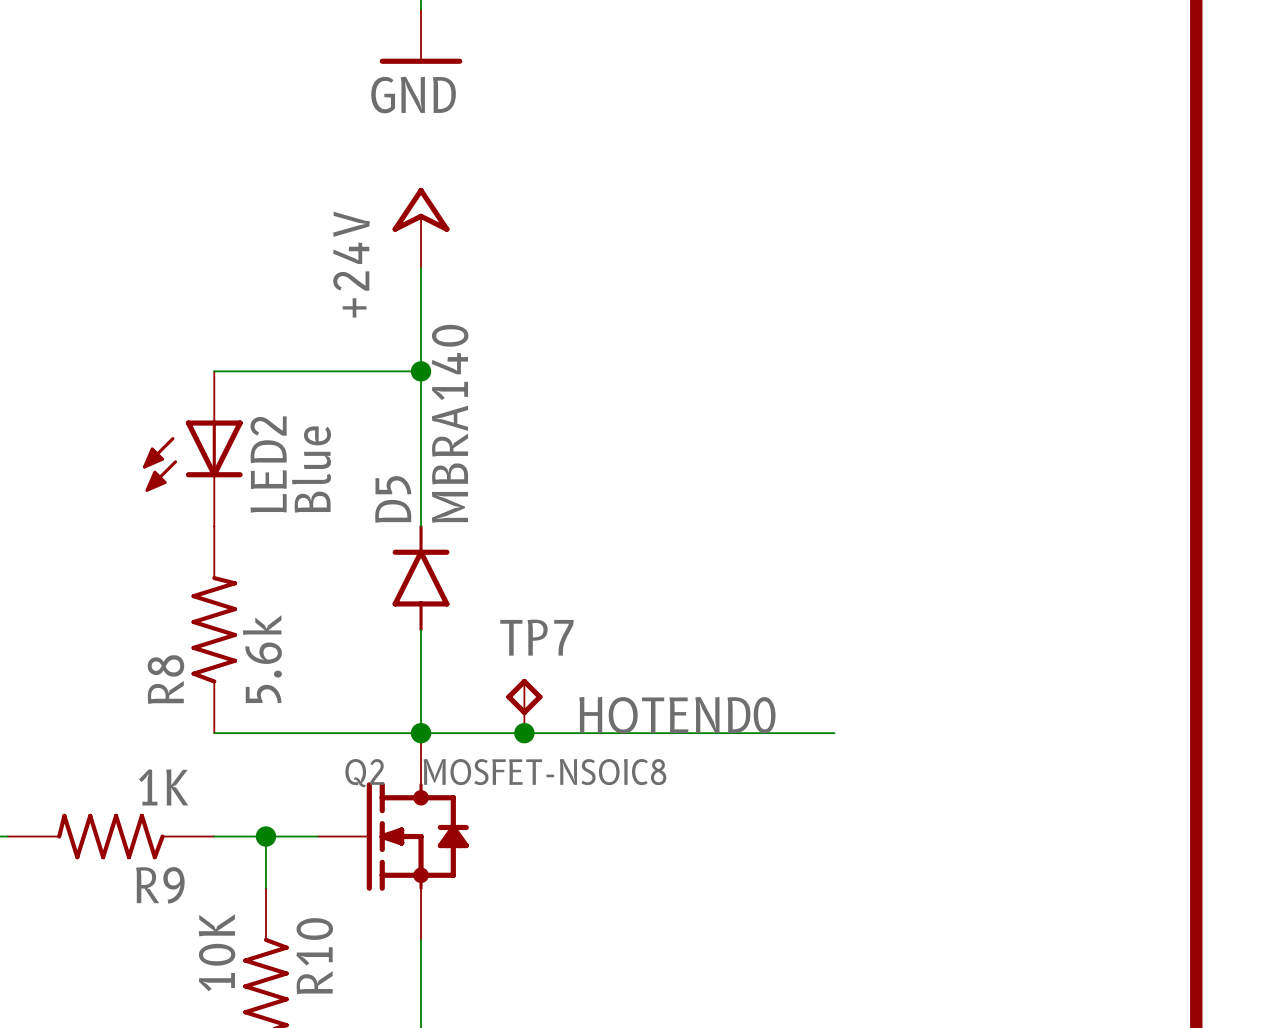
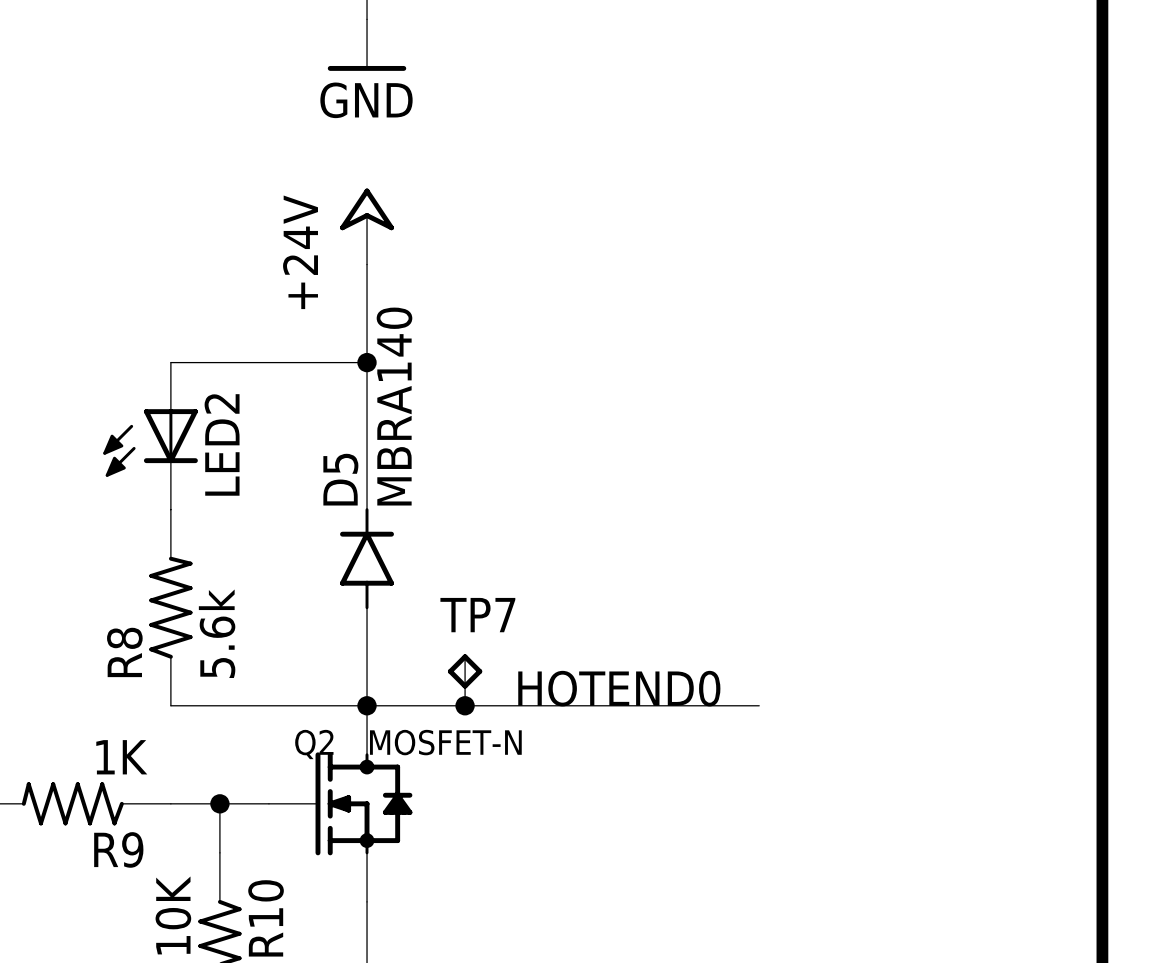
LED2 value: Blue (311, 469) -> none
Q2 value: MOSFET-NSOIC8 (544, 772) -> MOSFET-N (445, 742)

